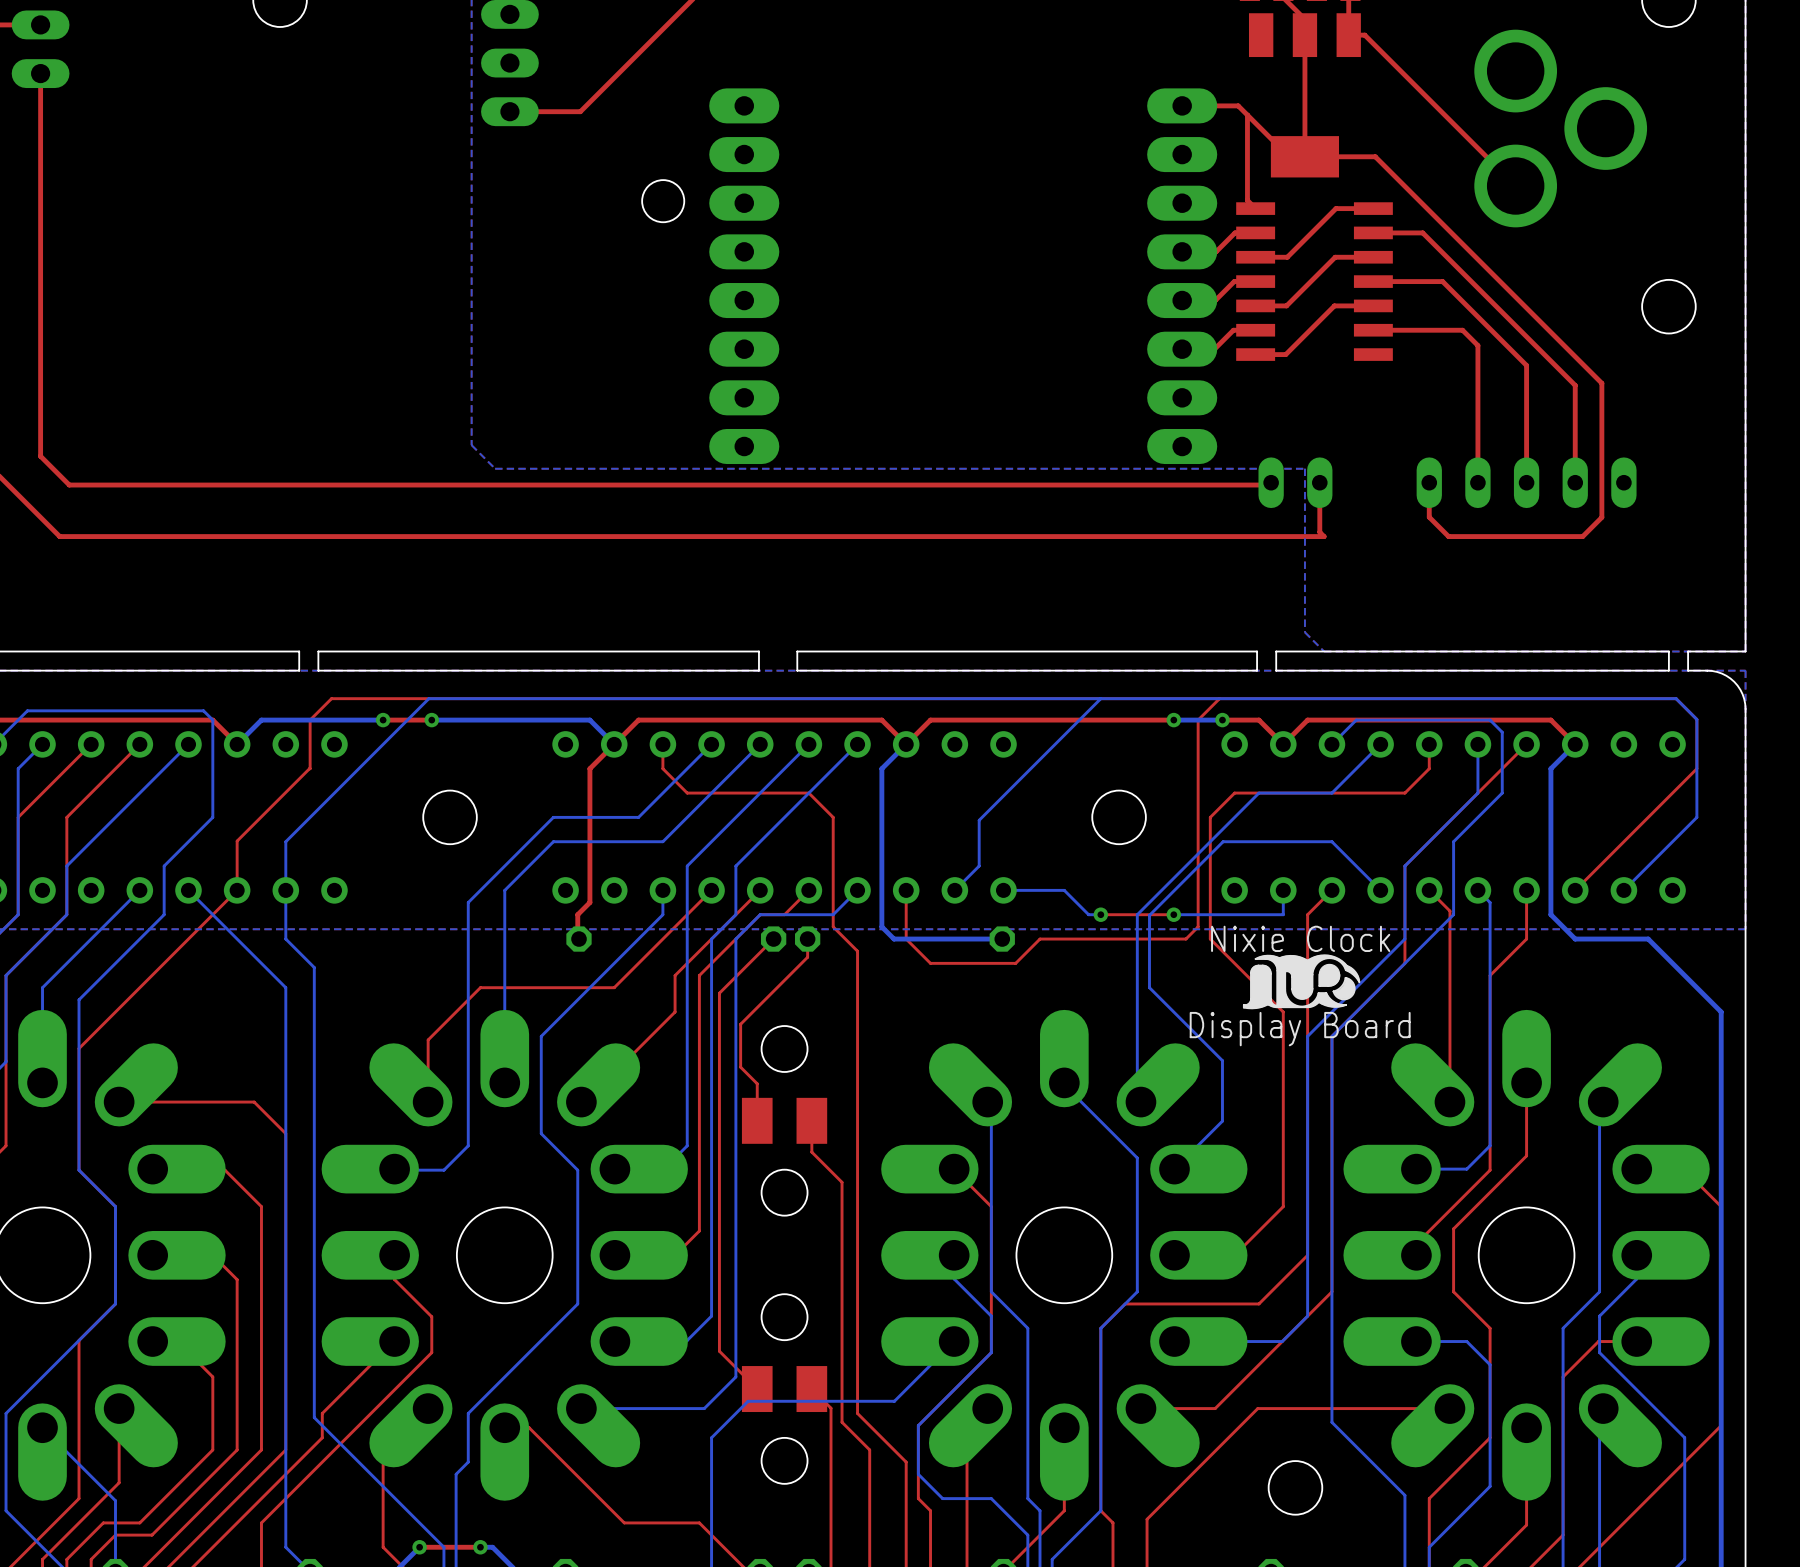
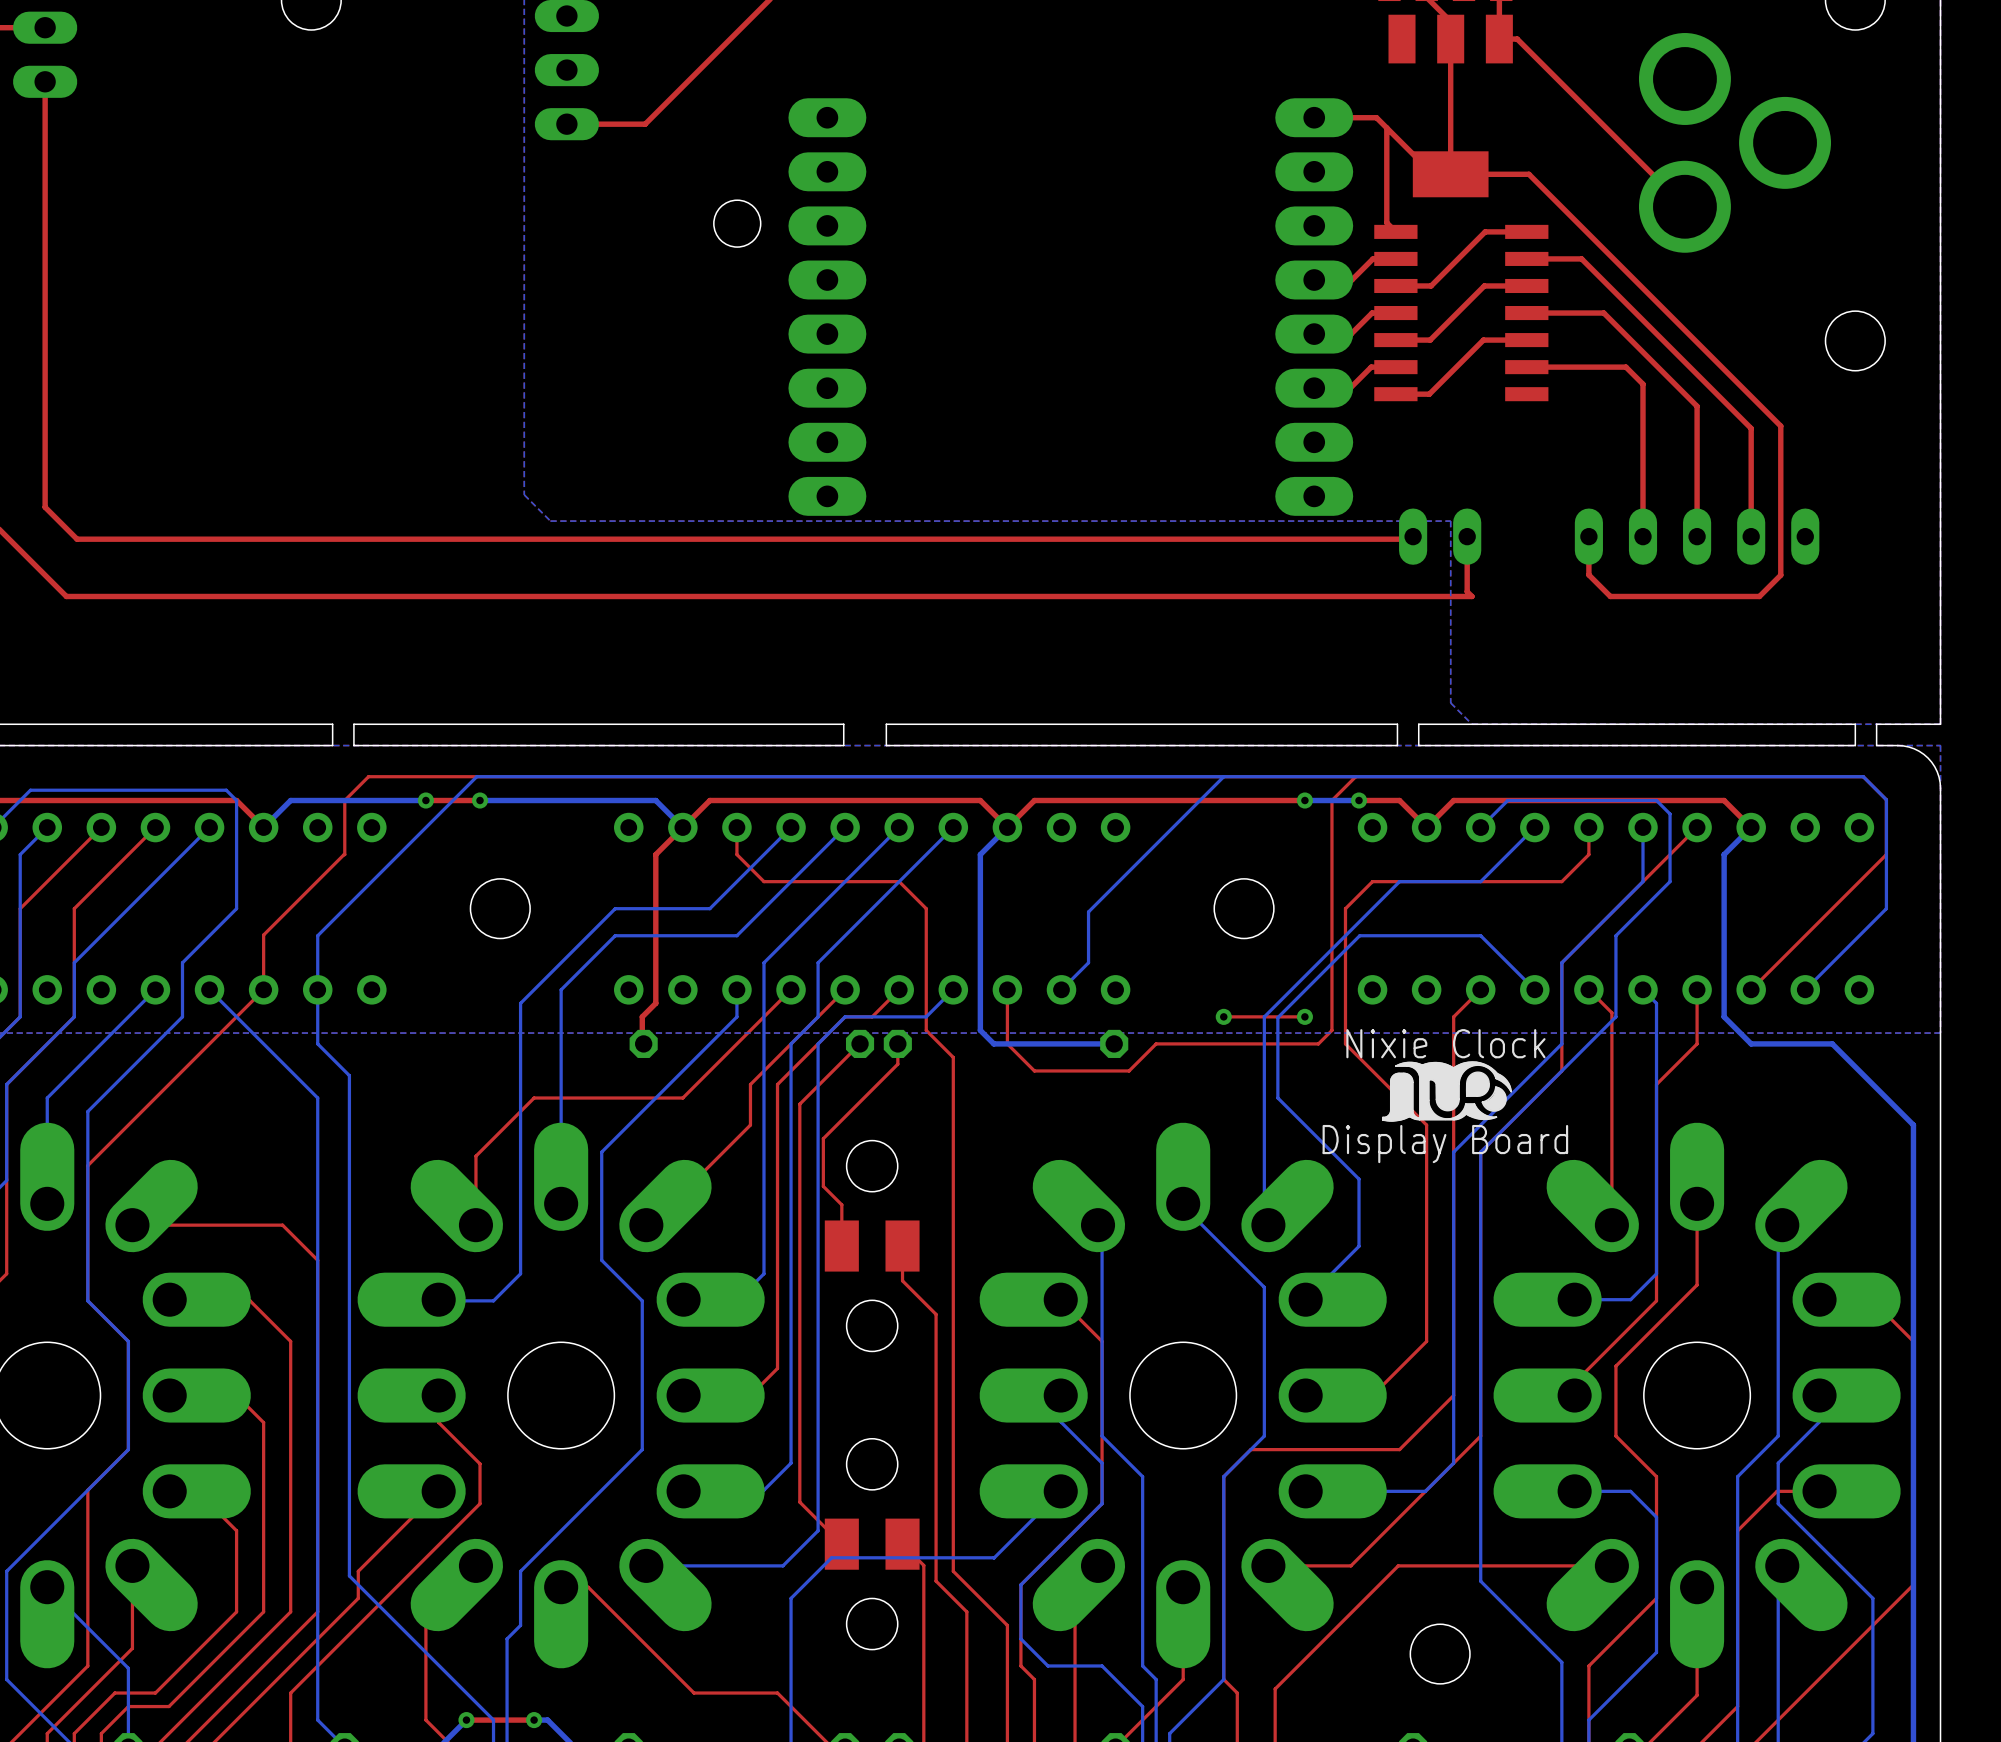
bottom track: (1003, 890) (1064, 890) (1088, 914) (1100, 914) -> none
bottom track: (1283, 890) (1283, 914) (1173, 914) -> none

